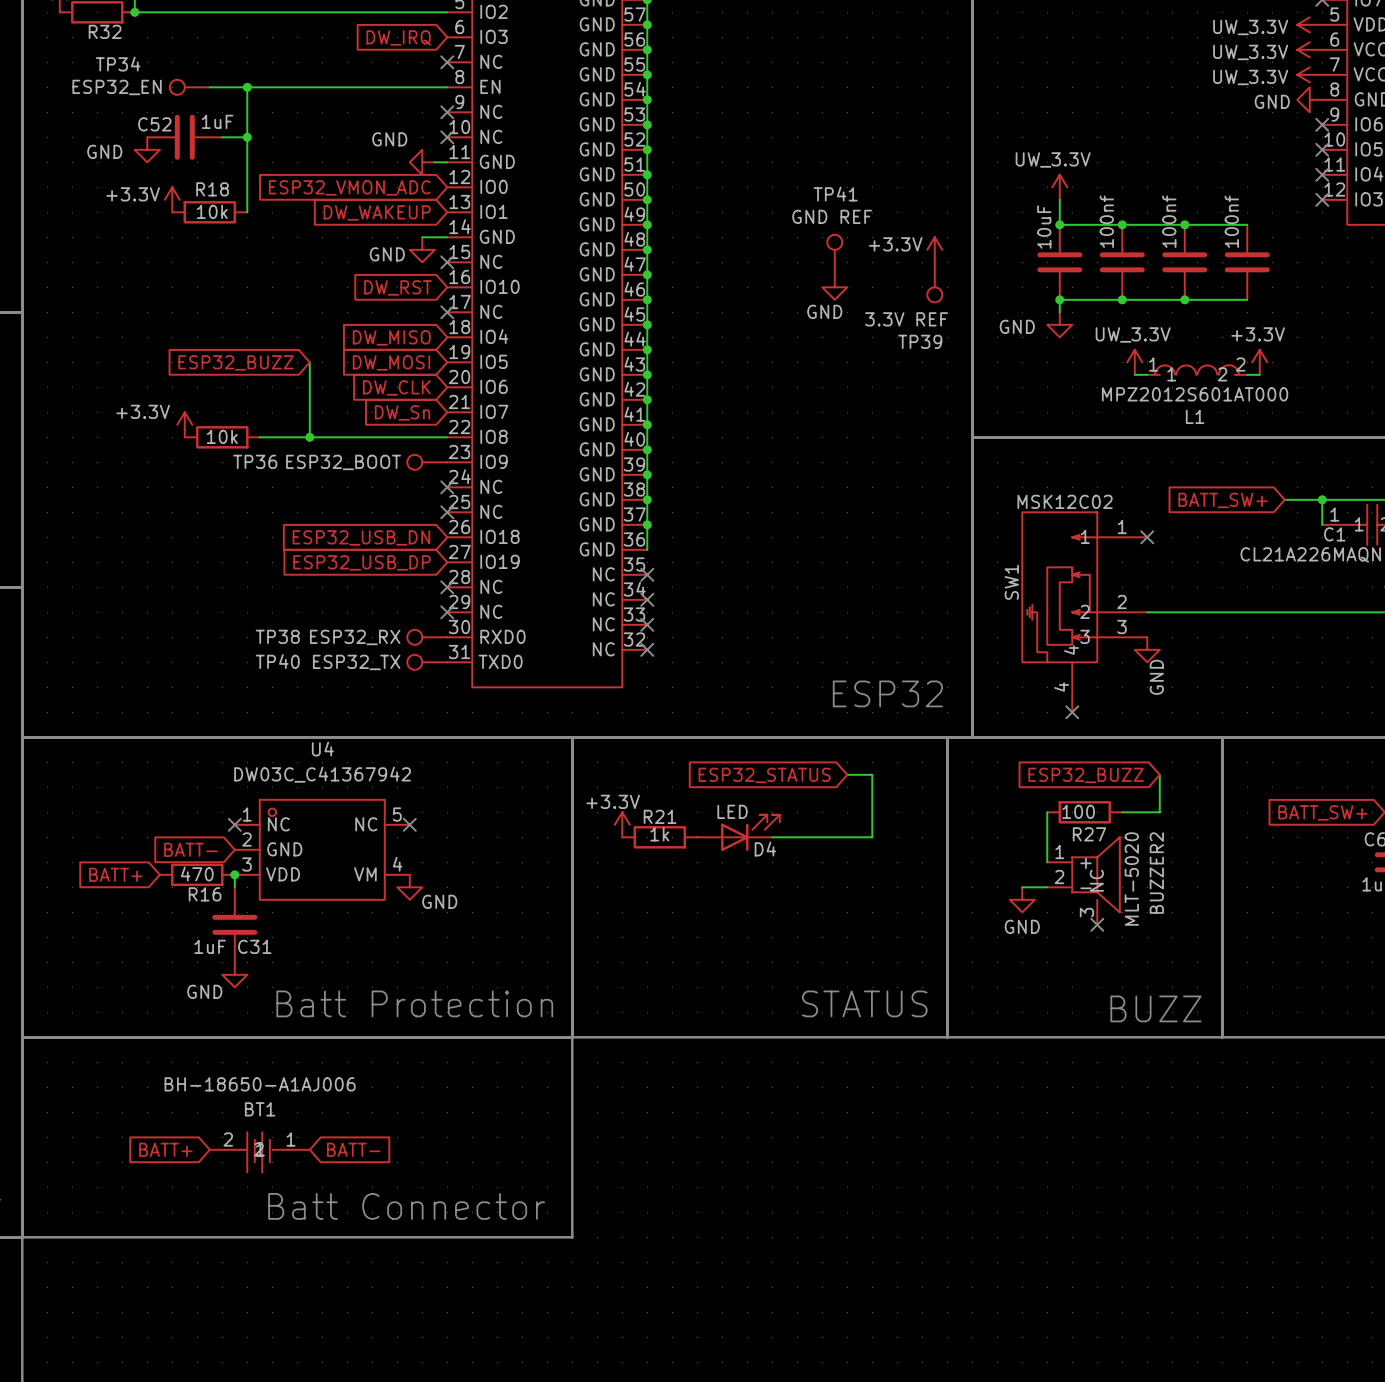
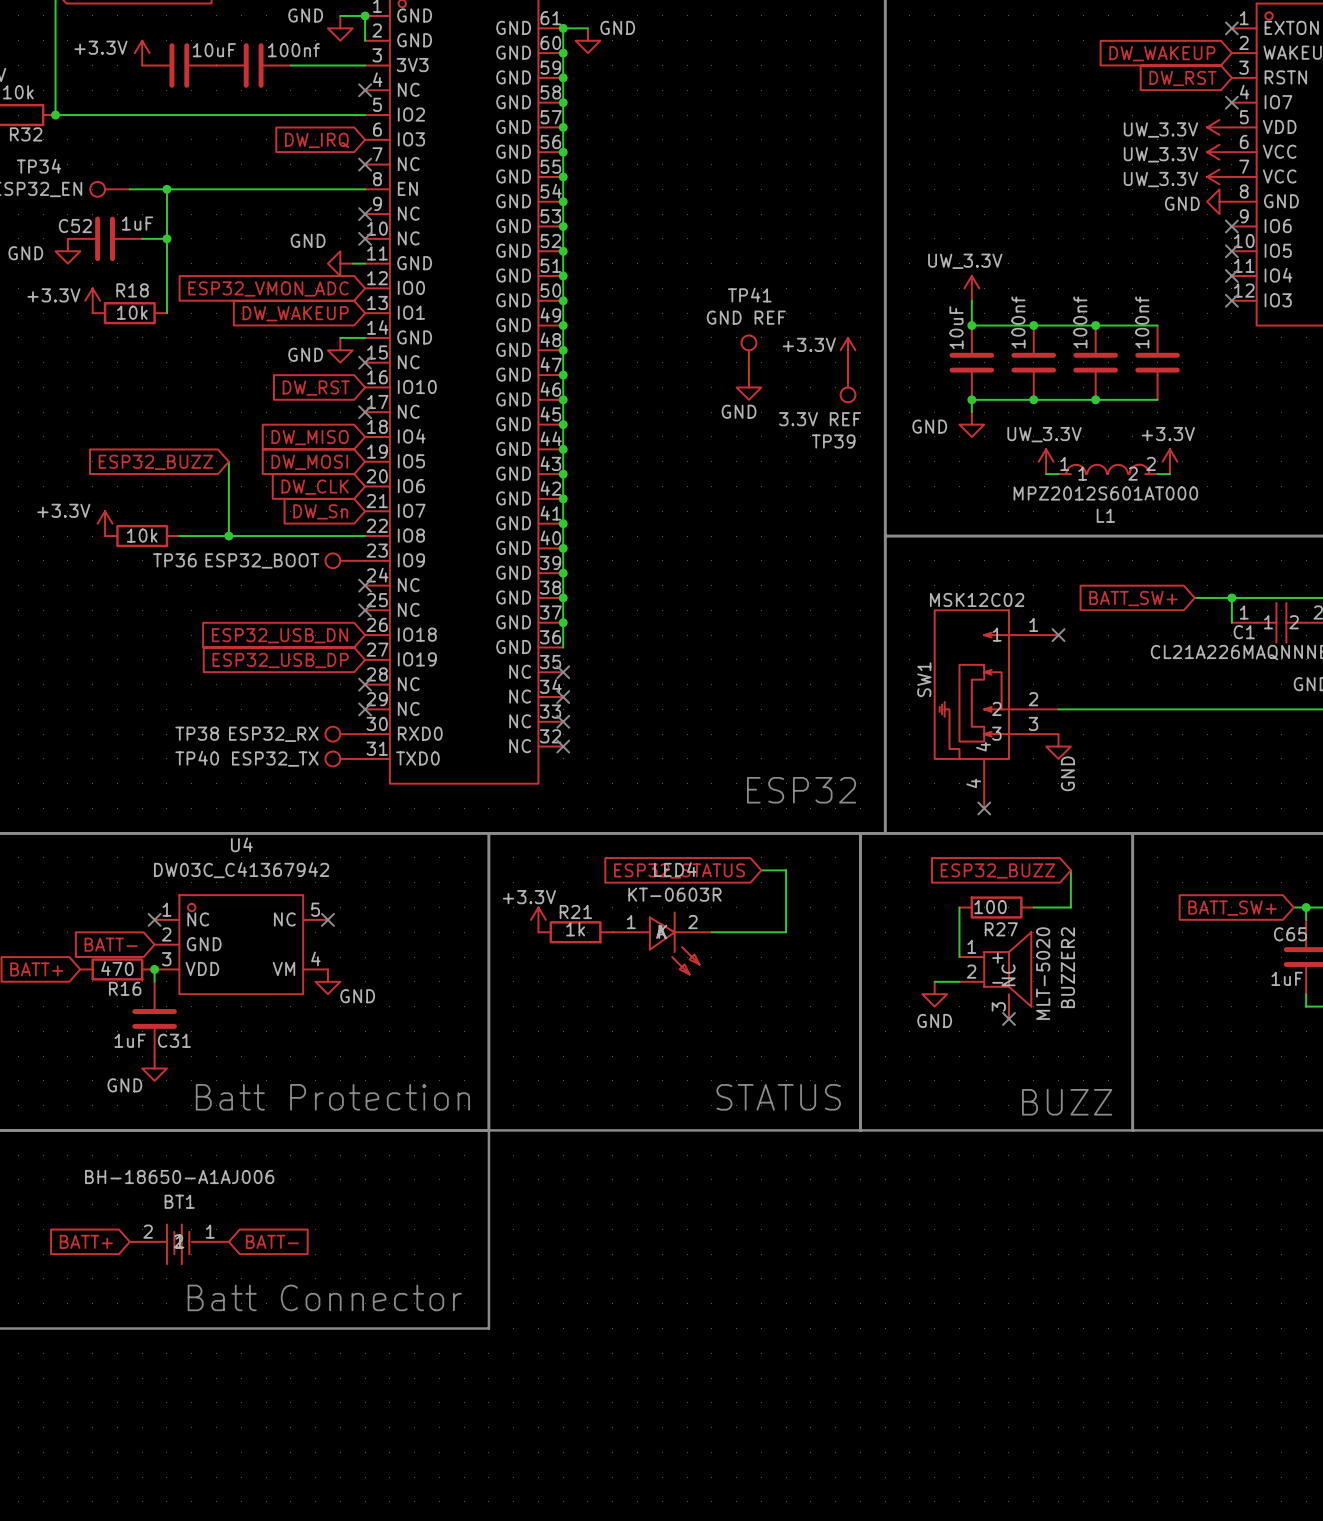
D4: LED (738, 832) -> none
LED4: none -> KT-0603R (662, 943)

